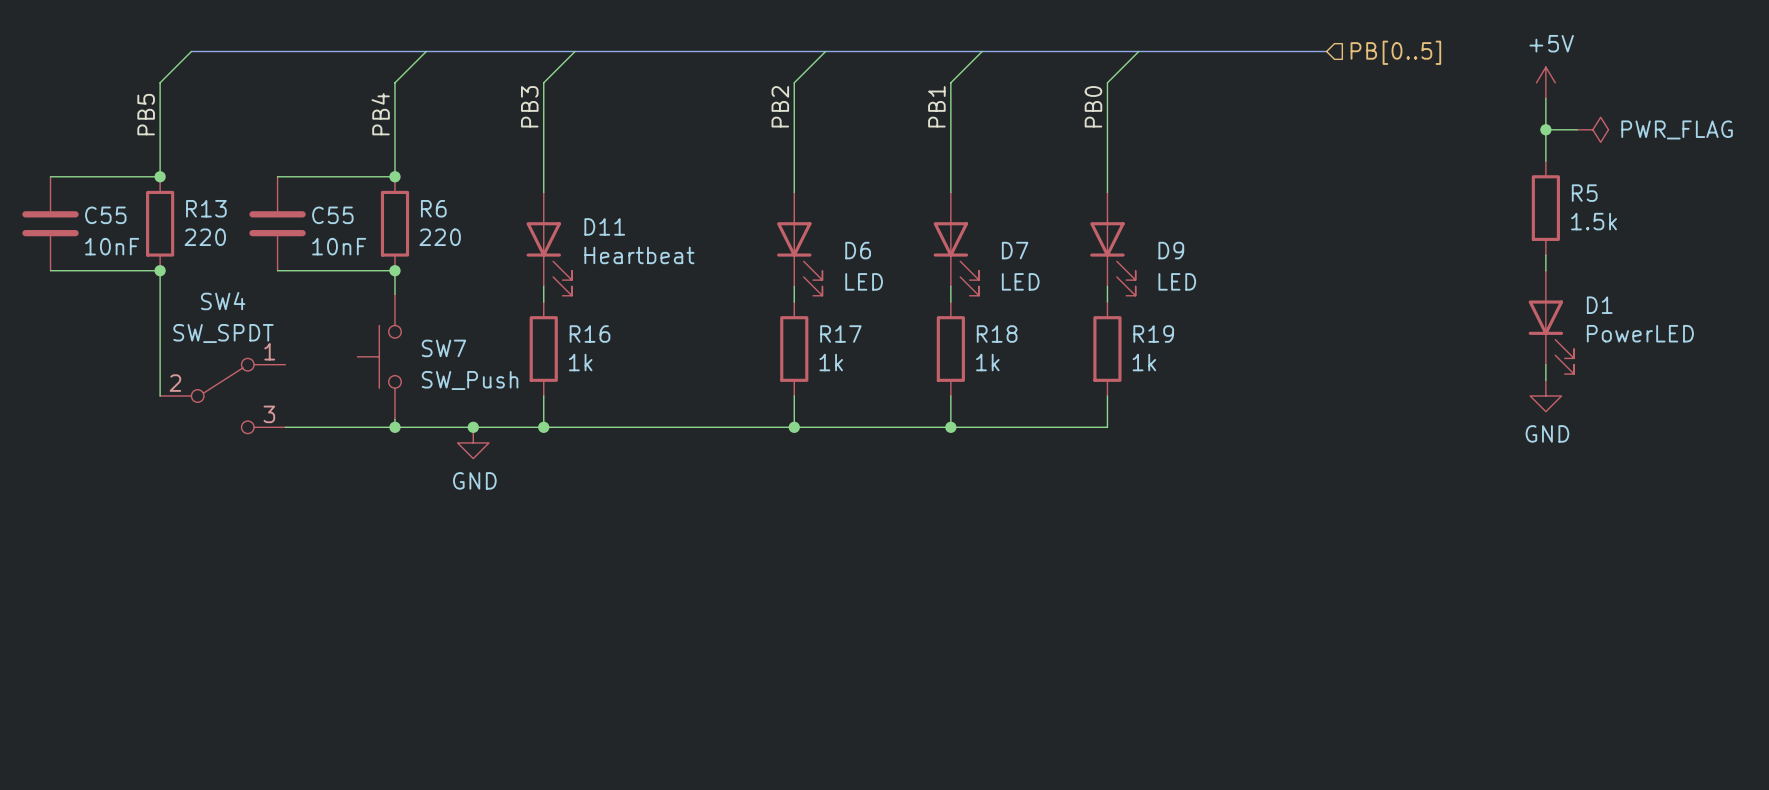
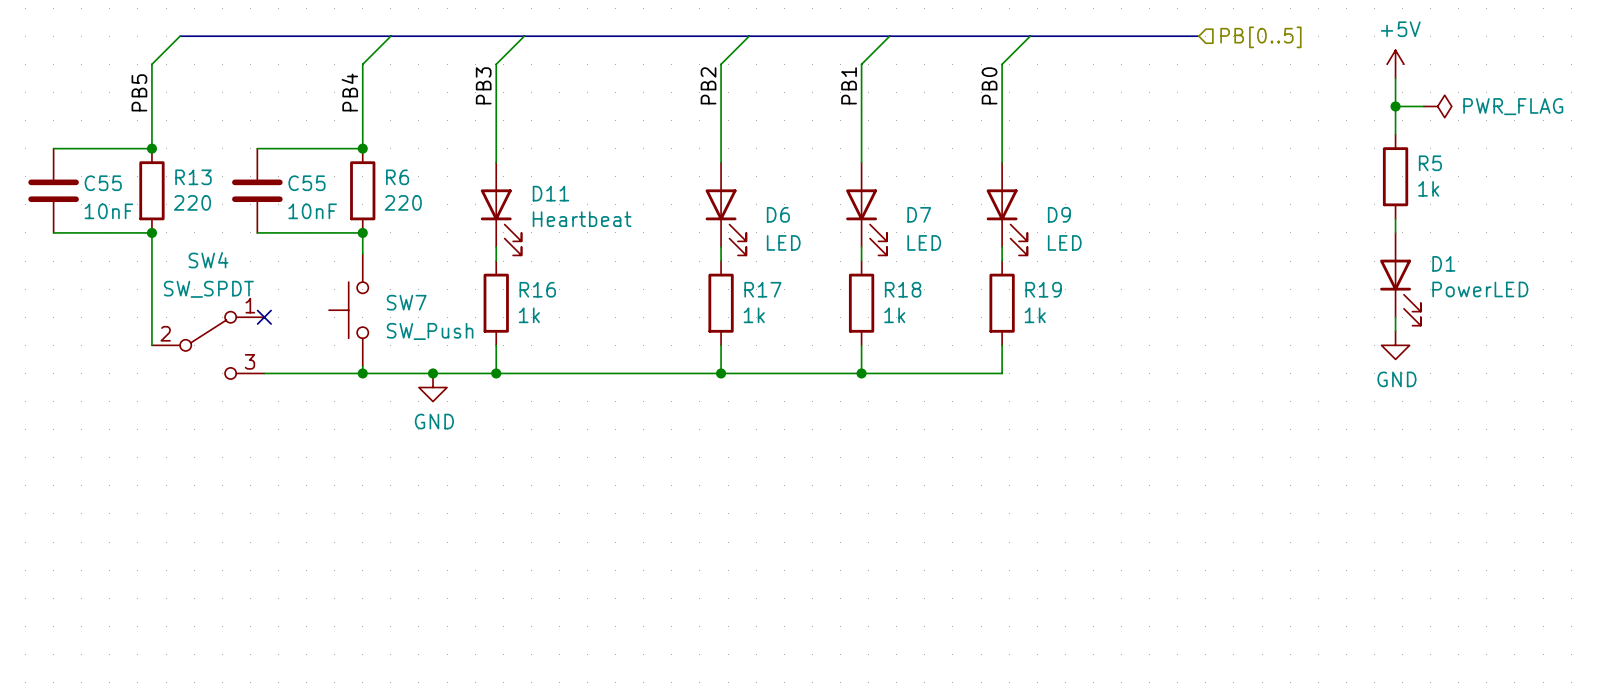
R5 value: 1.5k (1594, 221) -> 1k (1428, 188)
no-connect mark: none -> (264, 317)

